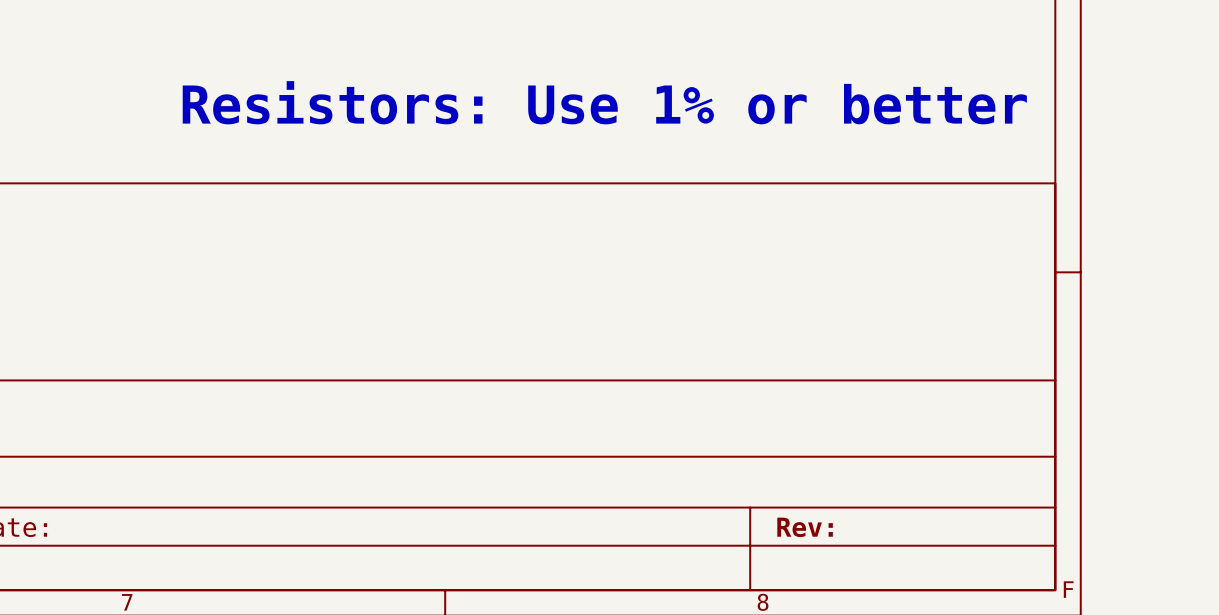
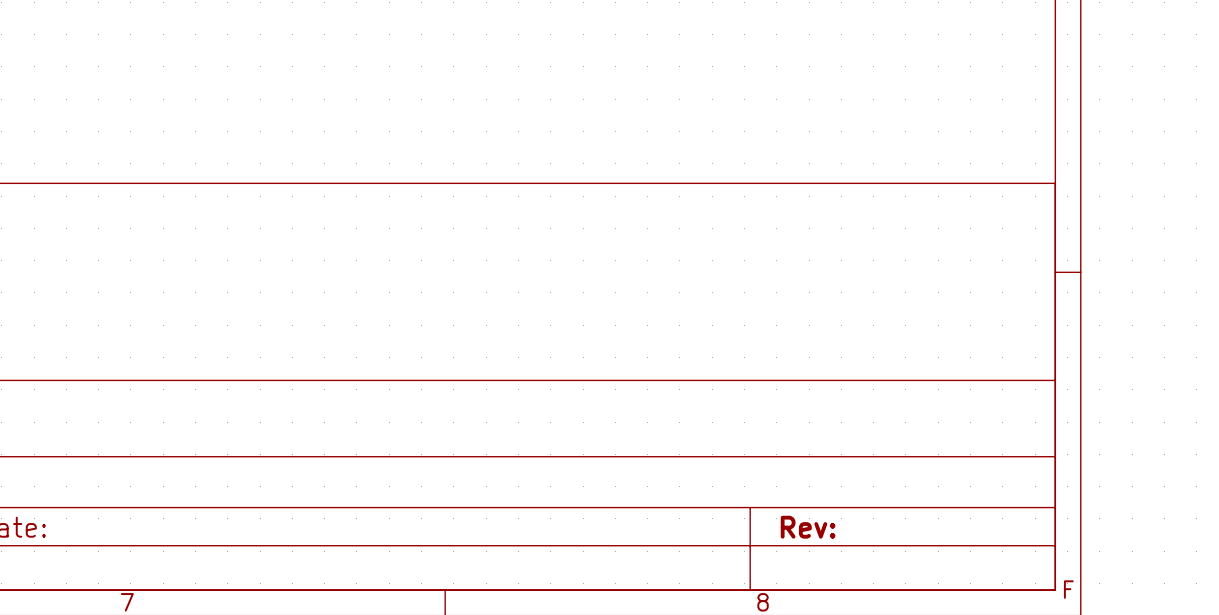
text: Resistors: Use 1% or better (604, 102) -> none

